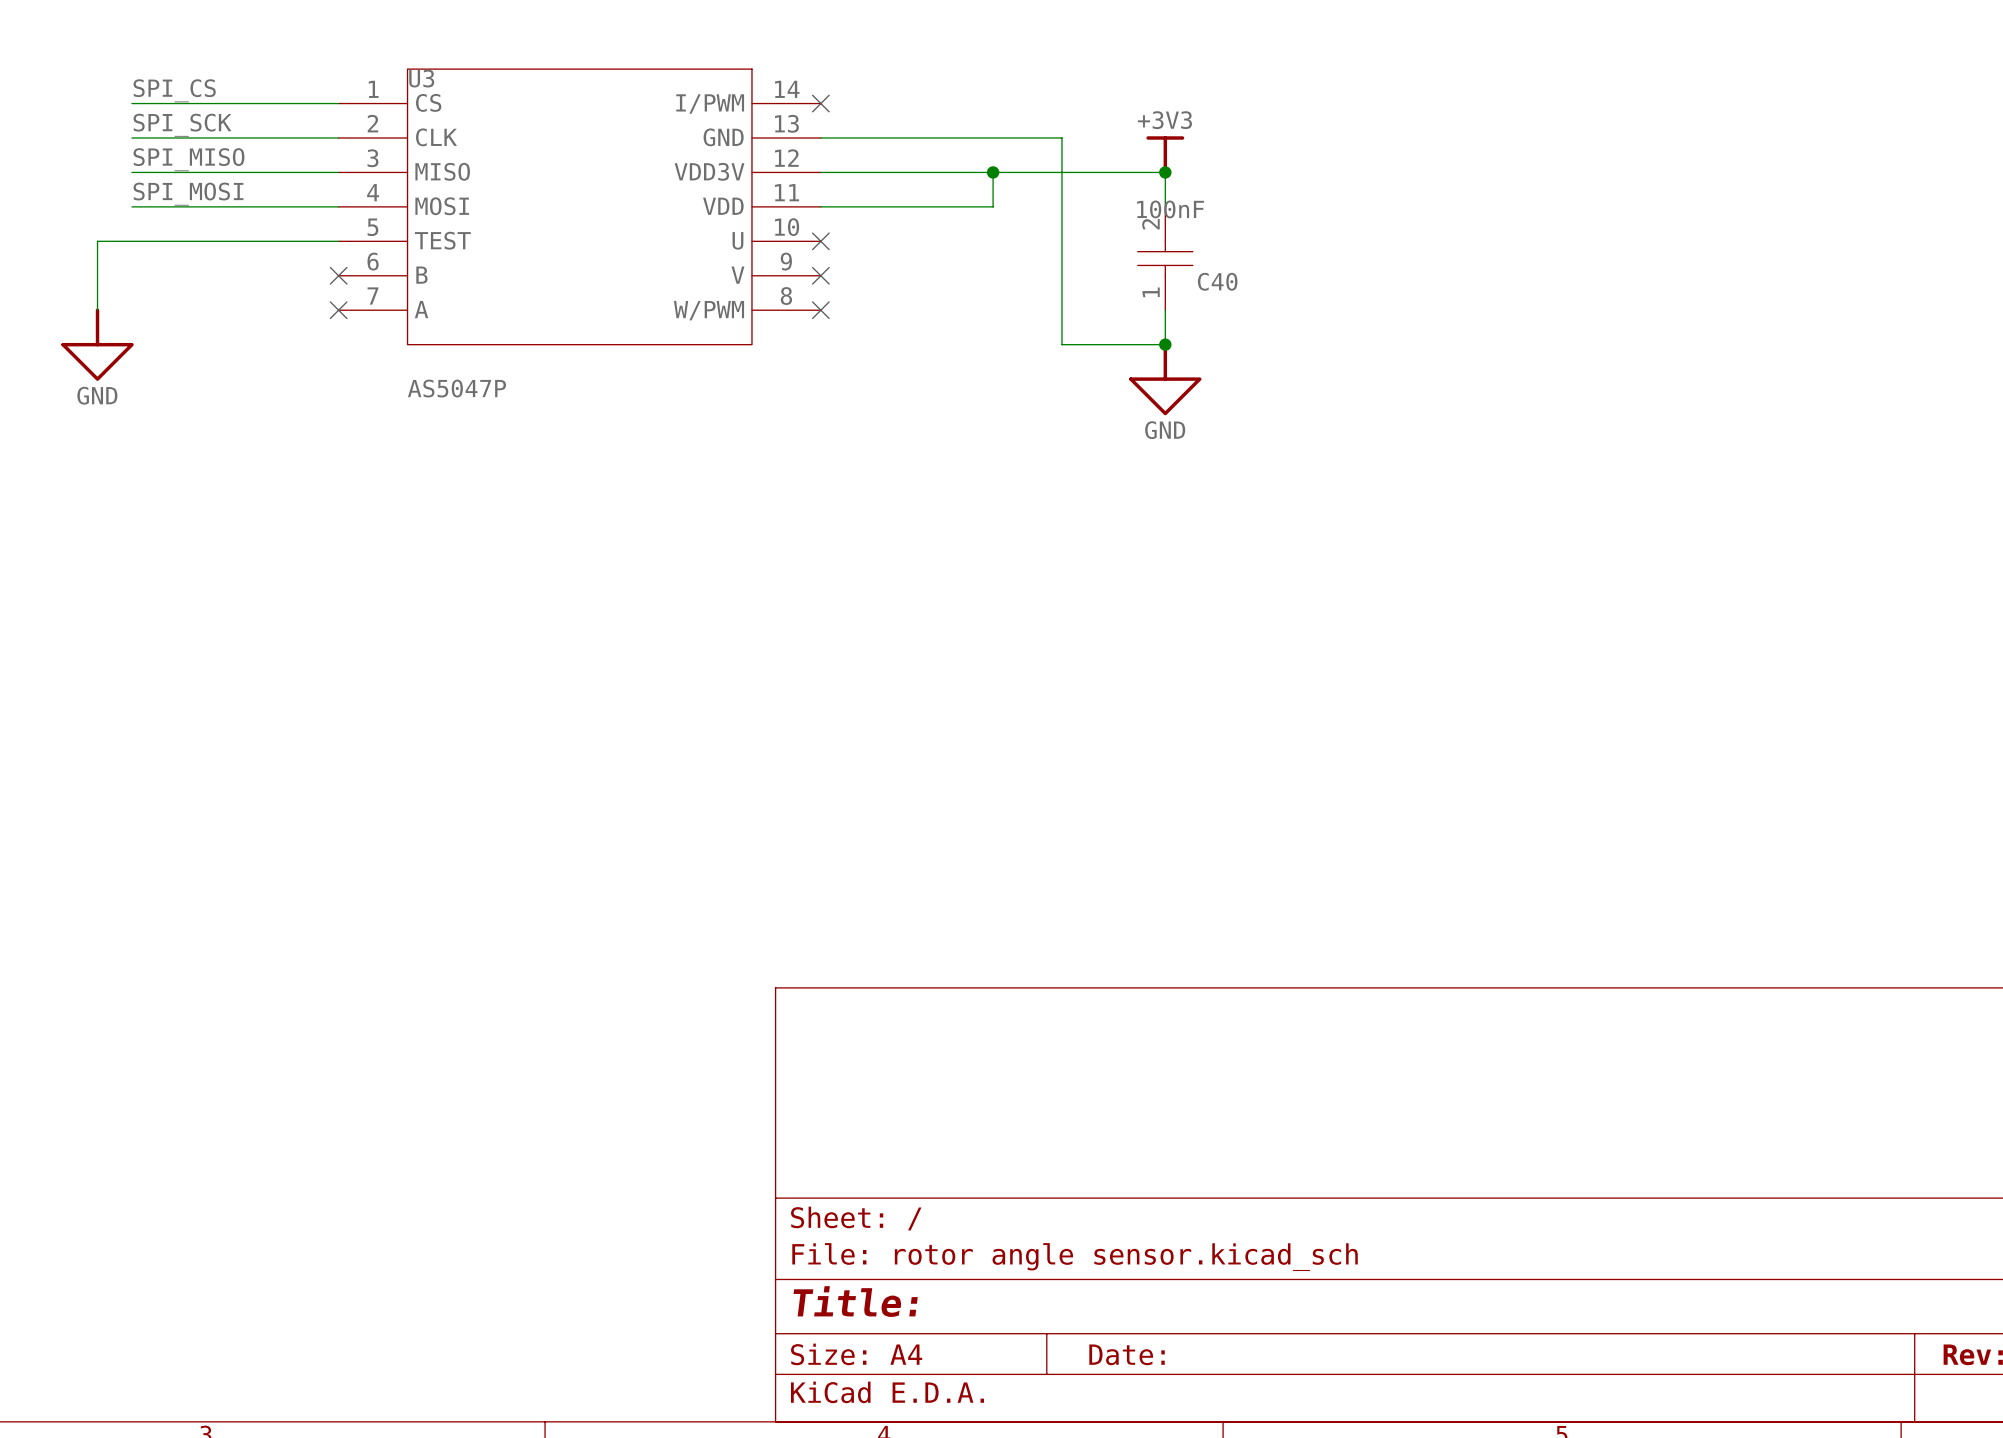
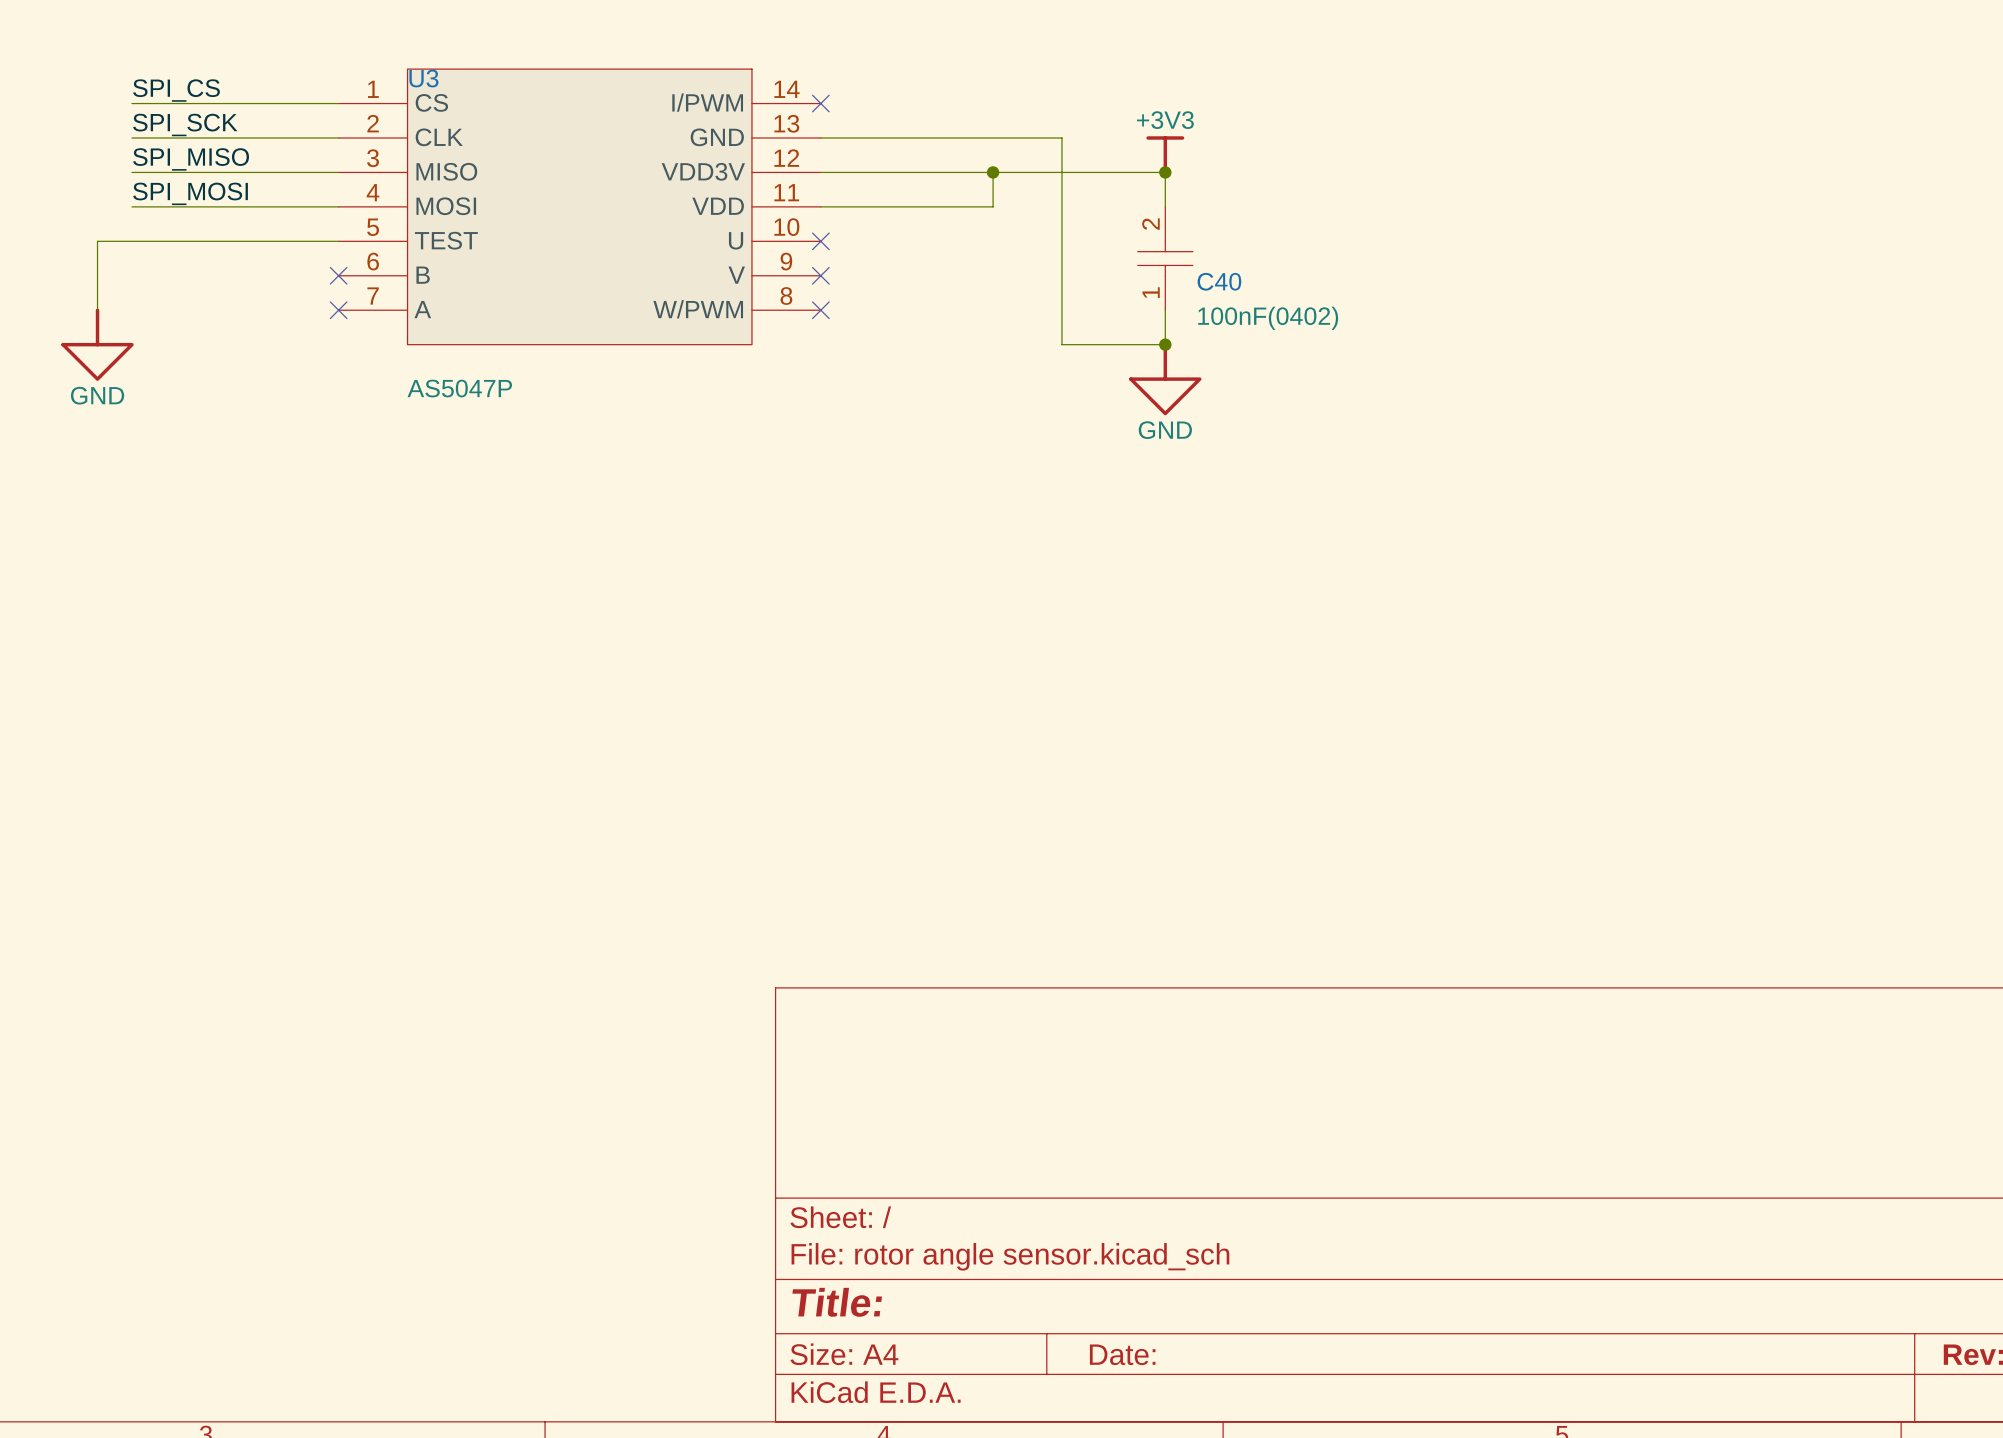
C40 value: 100nF (1170, 209) -> none
C40 text: none -> 100nF(0402) (1268, 318)

